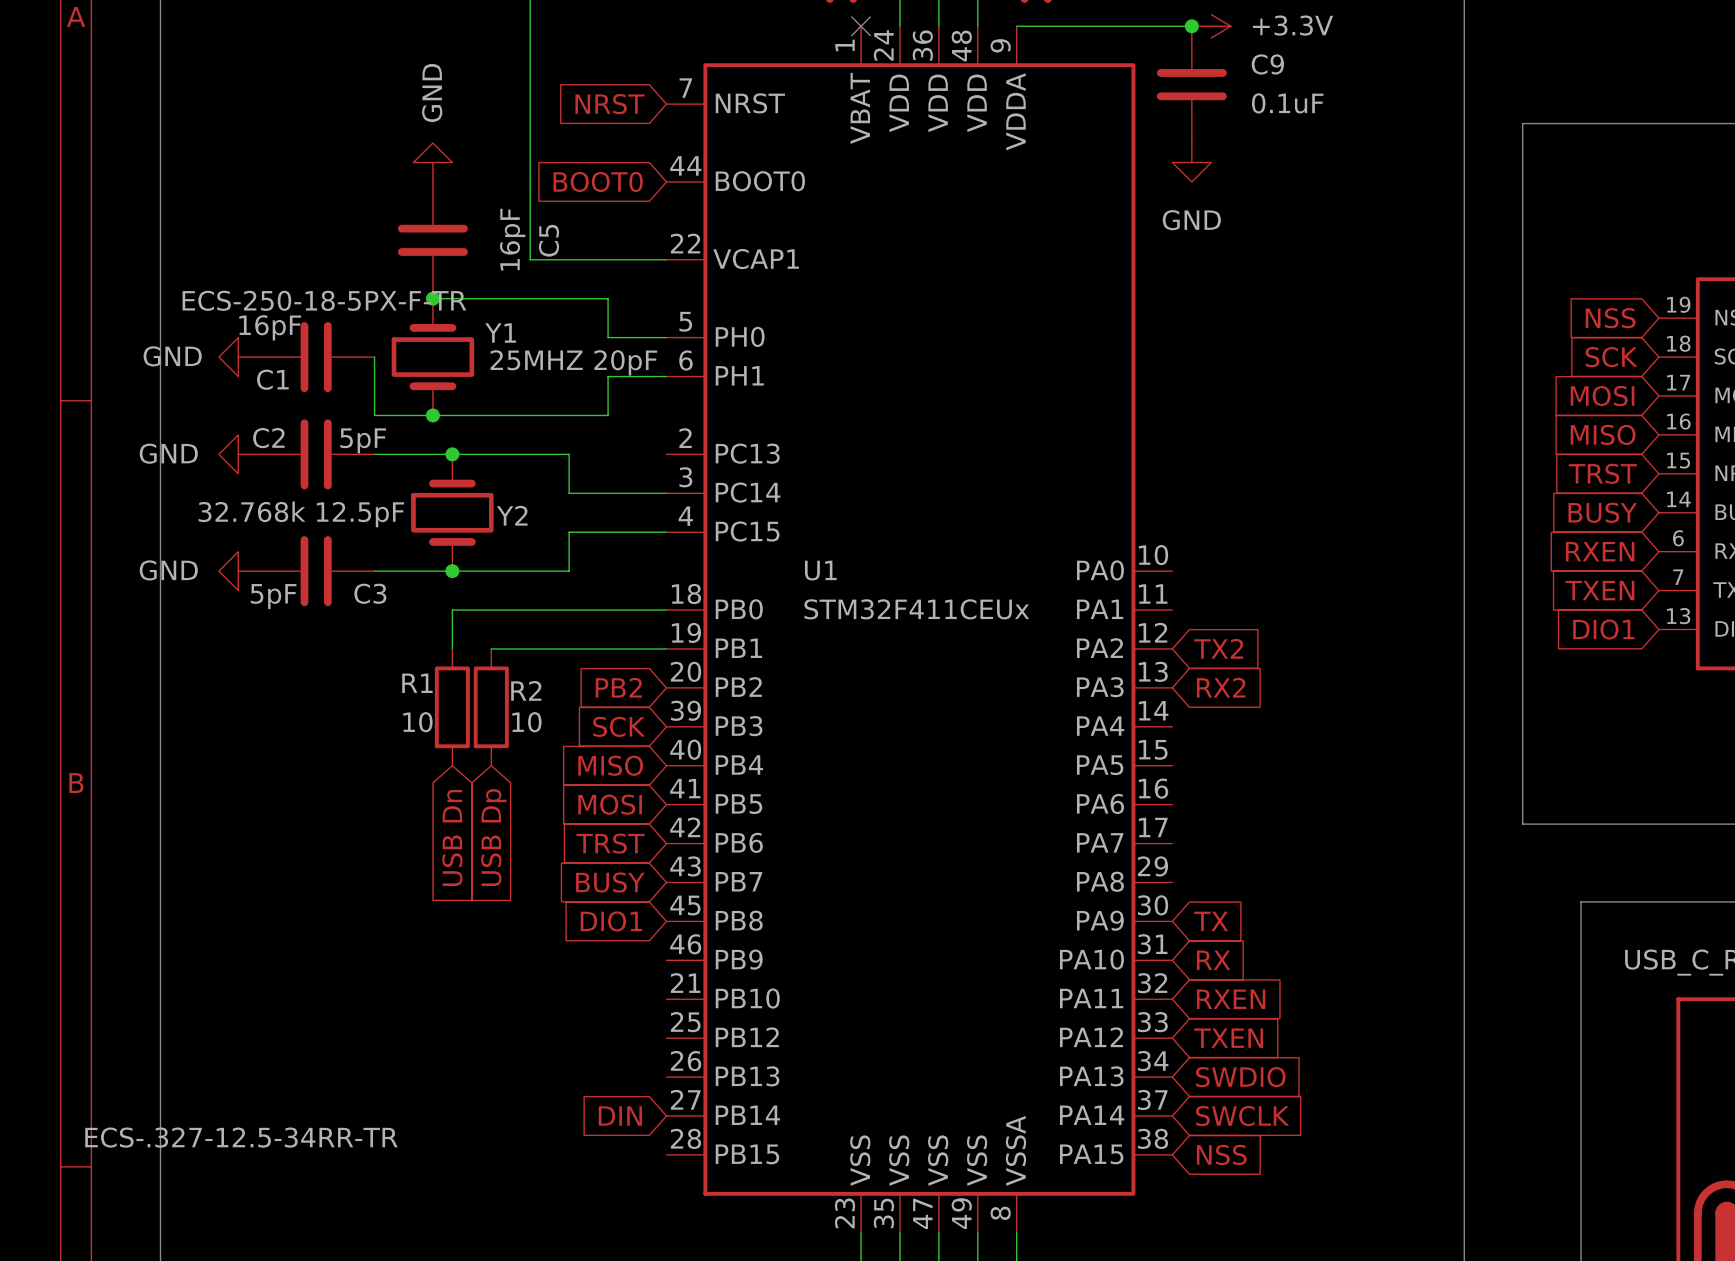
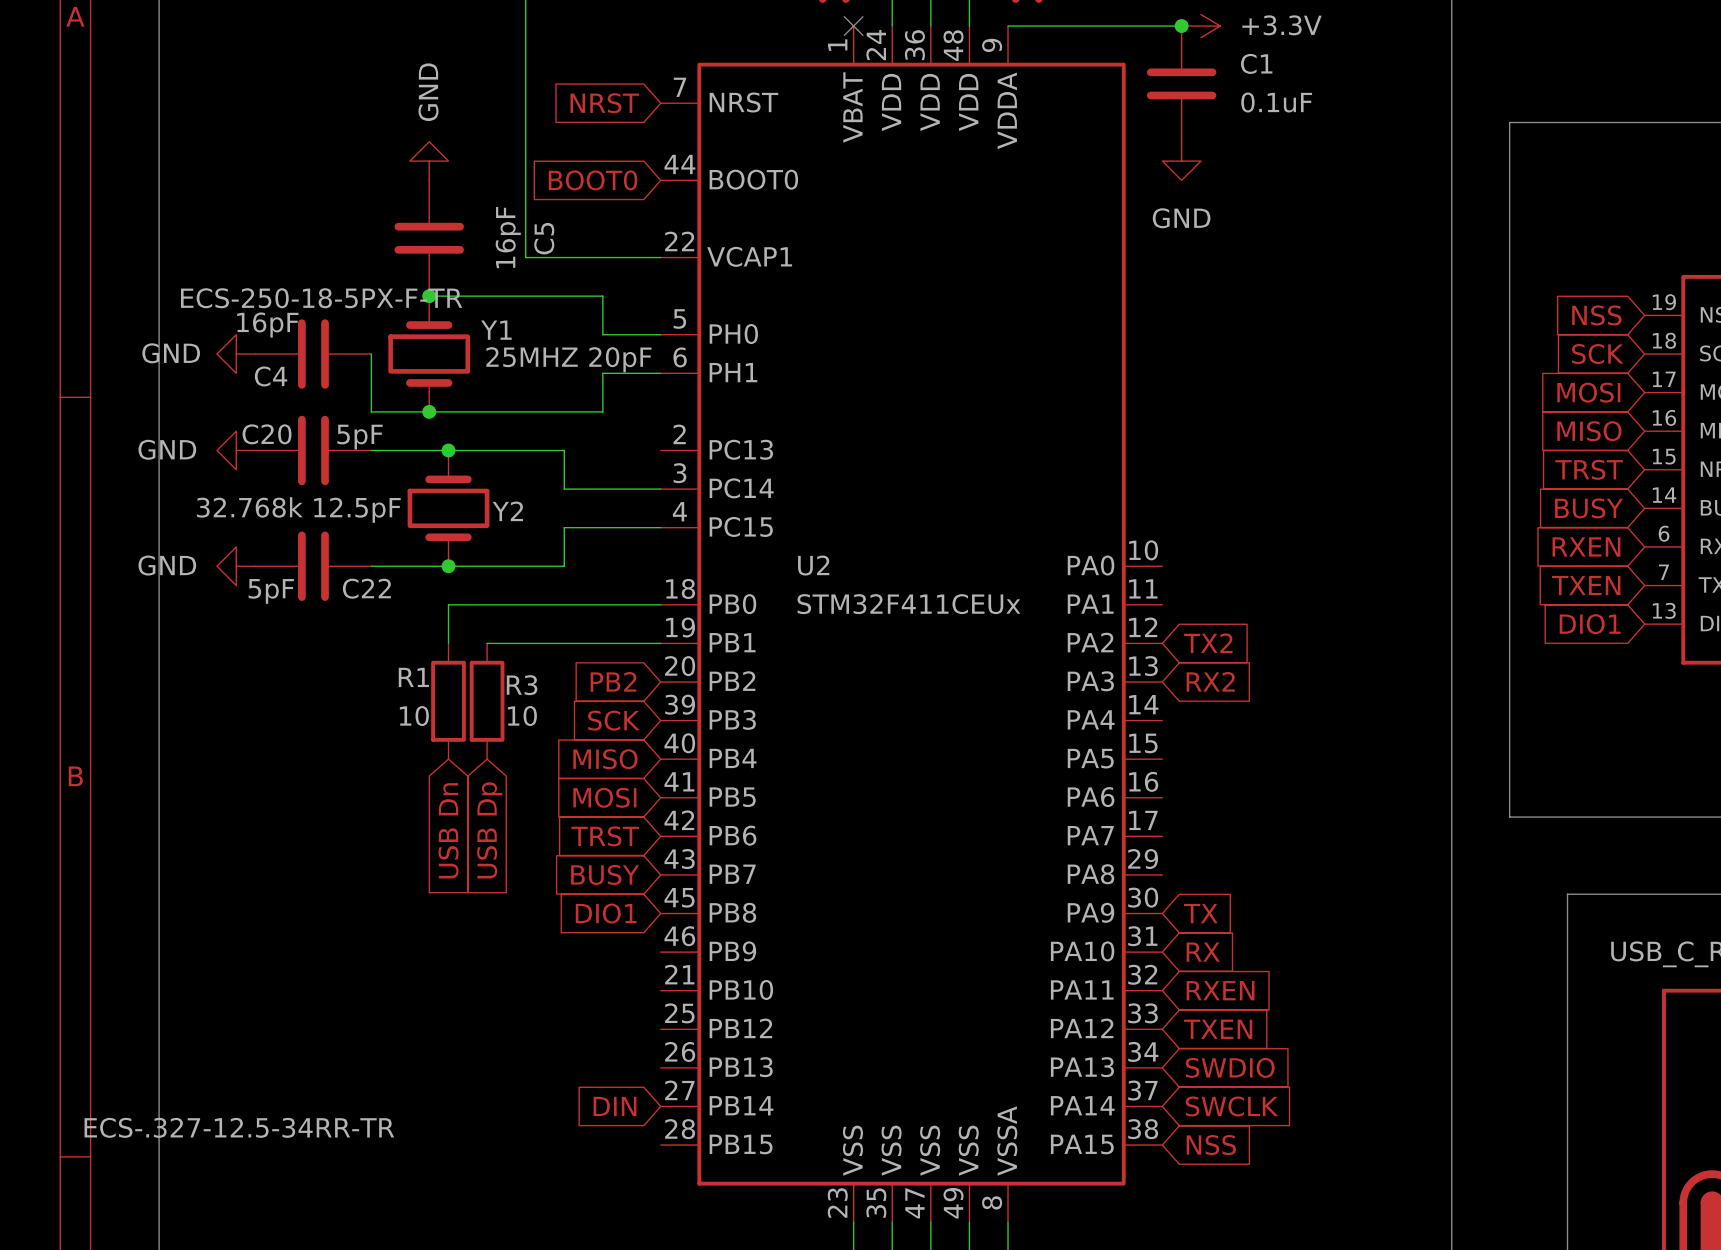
C9 name: C9 (1267, 64) -> C1 (1256, 63)
C1 name: C1 (272, 379) -> C4 (271, 376)
C2 name: C2 (268, 438) -> C20 (267, 434)
U1 name: U1 (820, 570) -> U2 (813, 565)
C3 name: C3 (370, 593) -> C22 (366, 588)
R2 name: R2 (526, 690) -> R3 (522, 685)

